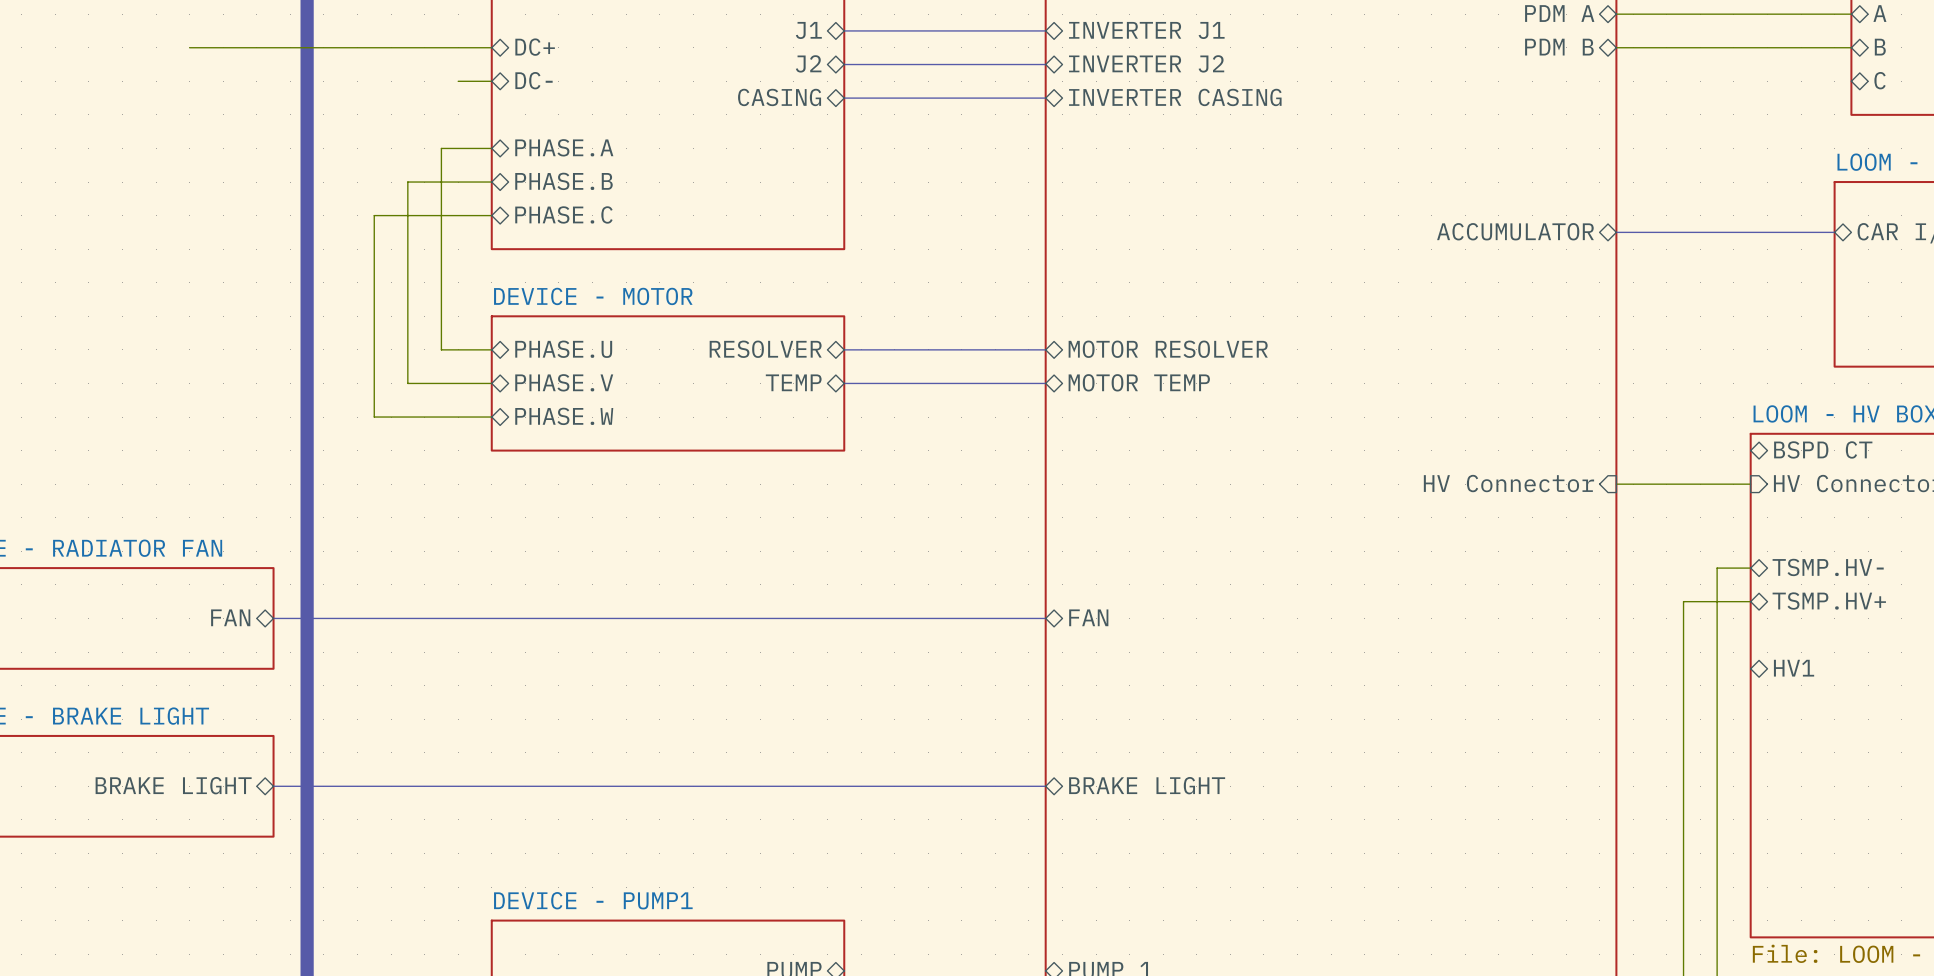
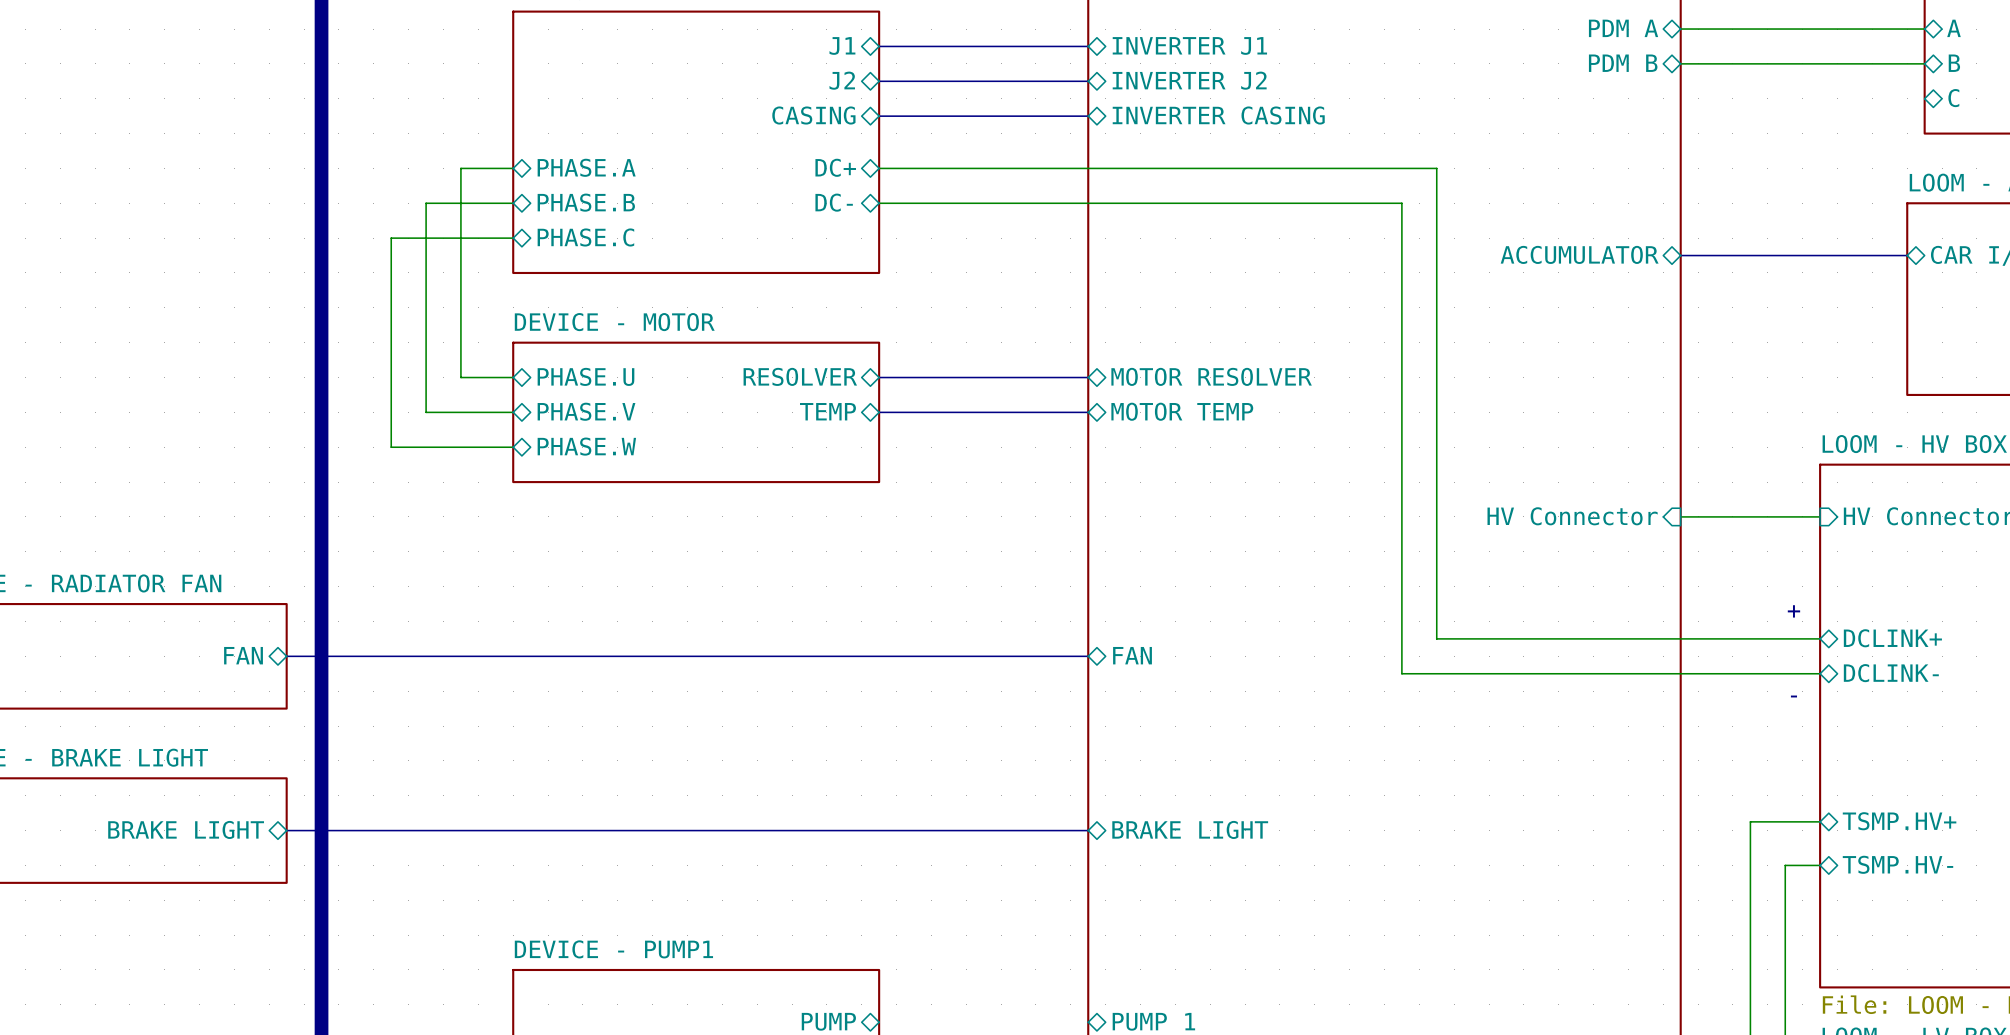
wire: (189, 47) (491, 47) -> none
sheet pin rotation: 0° (535, 47) -> 180° (835, 167)
sheet pin position: DC+ (535, 47) -> DC+ (835, 167)
sheet pin rotation: 0° (534, 80) -> 180° (834, 202)
sheet pin position: DC- (534, 80) -> DC- (834, 202)
wire: (458, 81) (491, 81) -> none
wire: none -> (879, 168) (1436, 168) (1436, 638) (1750, 638)
wire: none -> (879, 203) (1401, 203) (1401, 673) (1820, 673)
sheet pin: BSPD CT (1823, 449) -> none
sheet pin position: TSMP.HV- (1828, 567) -> TSMP.HV- (1897, 864)
wire: (1750, 568) (1717, 568) (1717, 819) -> (1820, 865) (1785, 865)
text: none -> + (1793, 611)
wire: (1683, 601) (1683, 777) -> (1820, 821) (1750, 821)
sheet pin: TSMP.HV+ (1829, 601) -> DCLINK+ (1892, 638)
sheet pin: none -> DCLINK- (1891, 673)
text: none -> - (1793, 696)
sheet pin: HV1 (1794, 668) -> none
sheet pin: none -> TSMP.HV+ (1899, 821)

